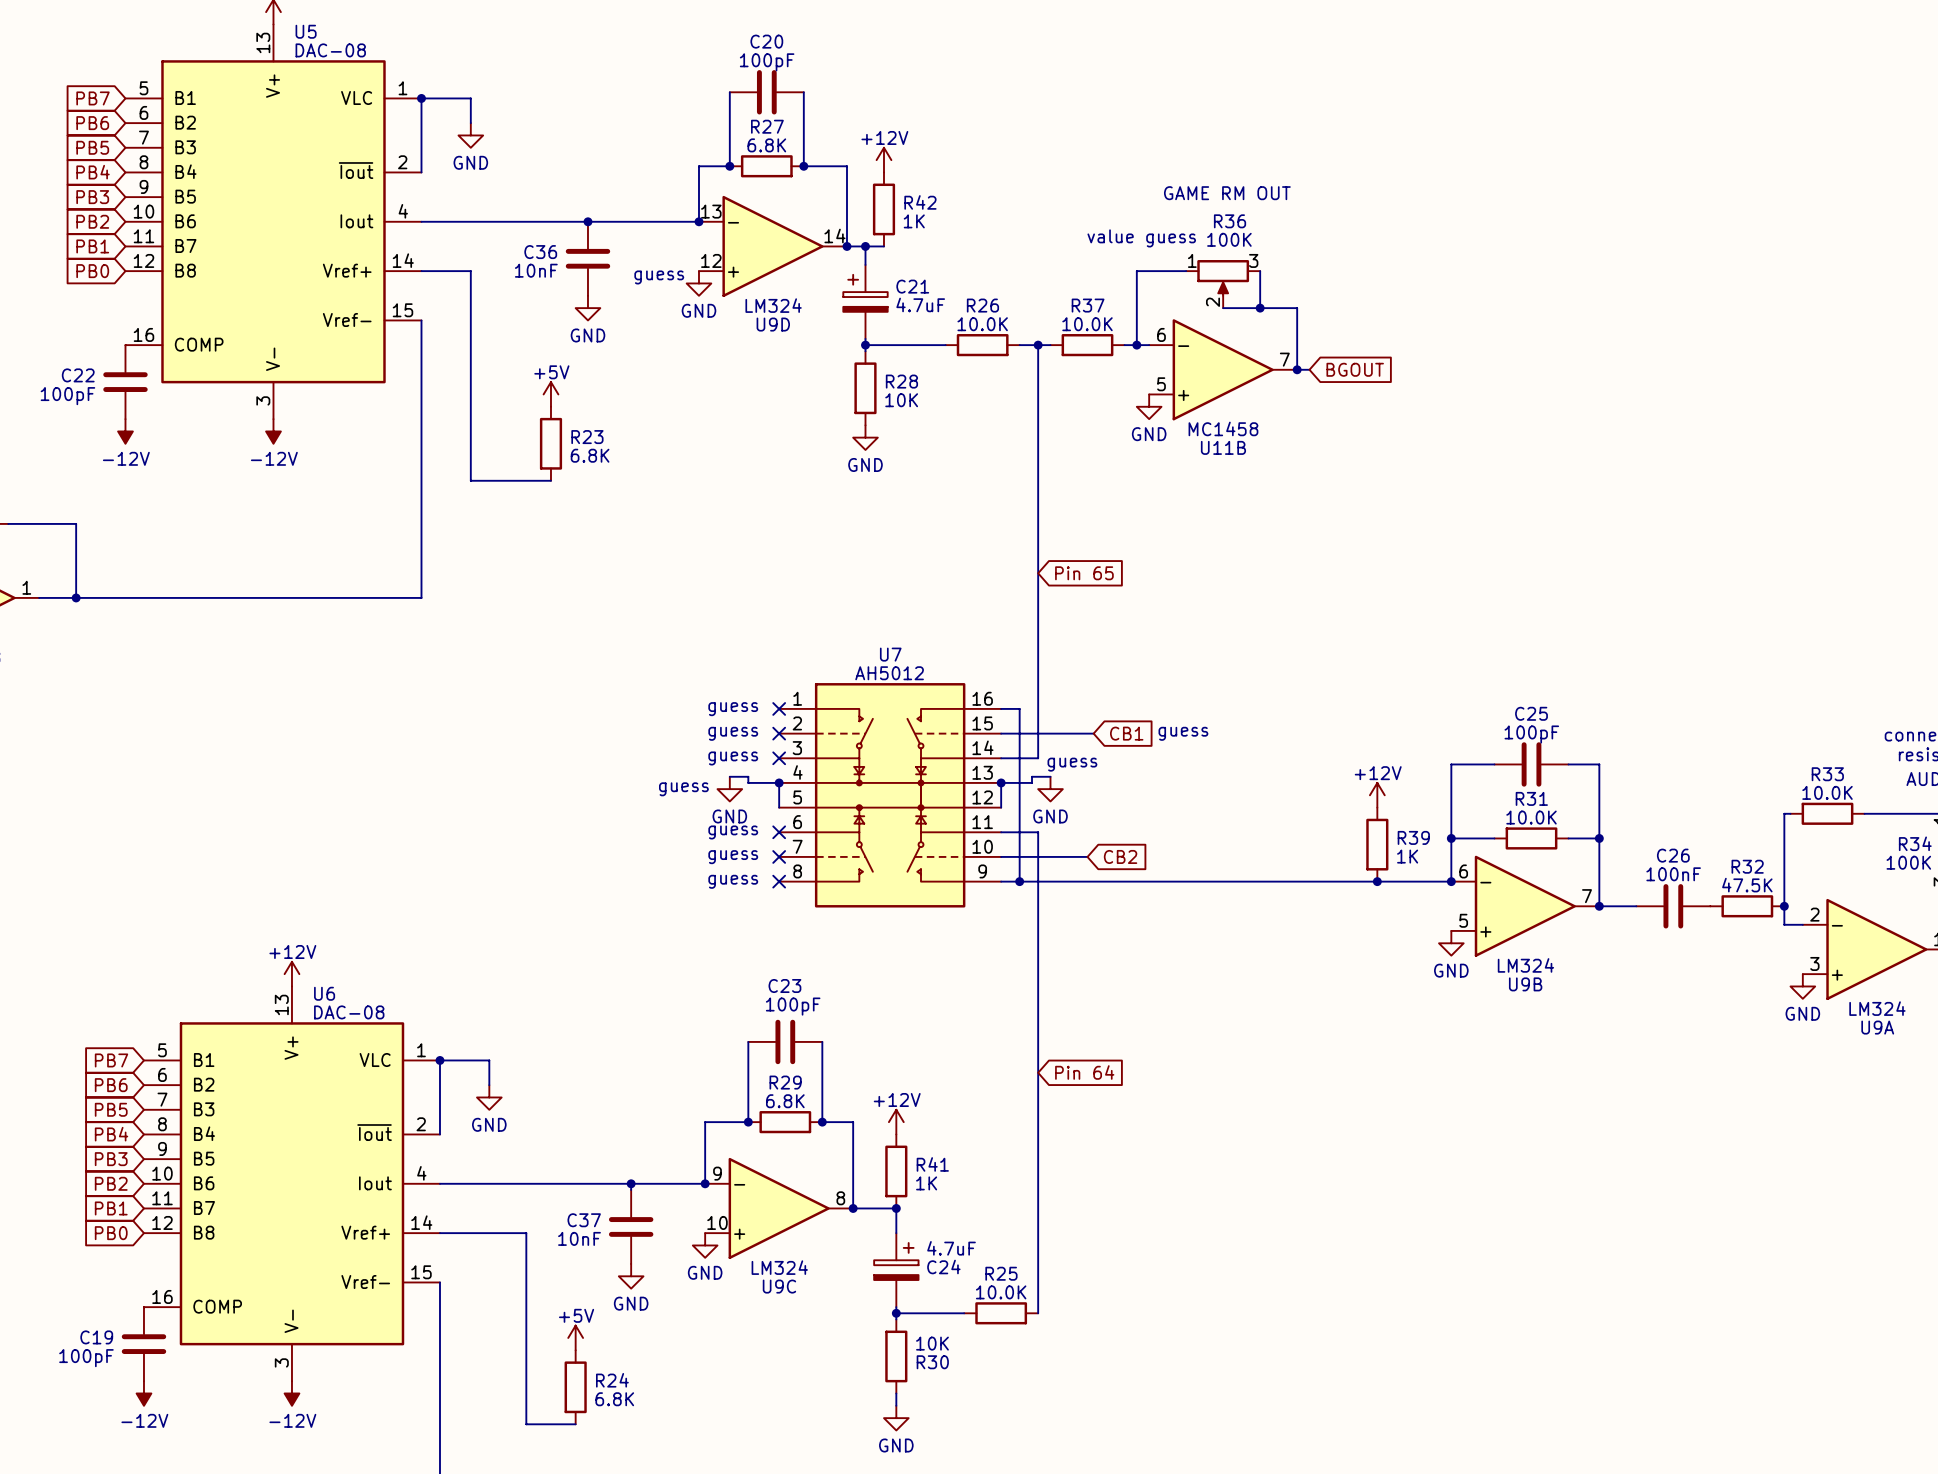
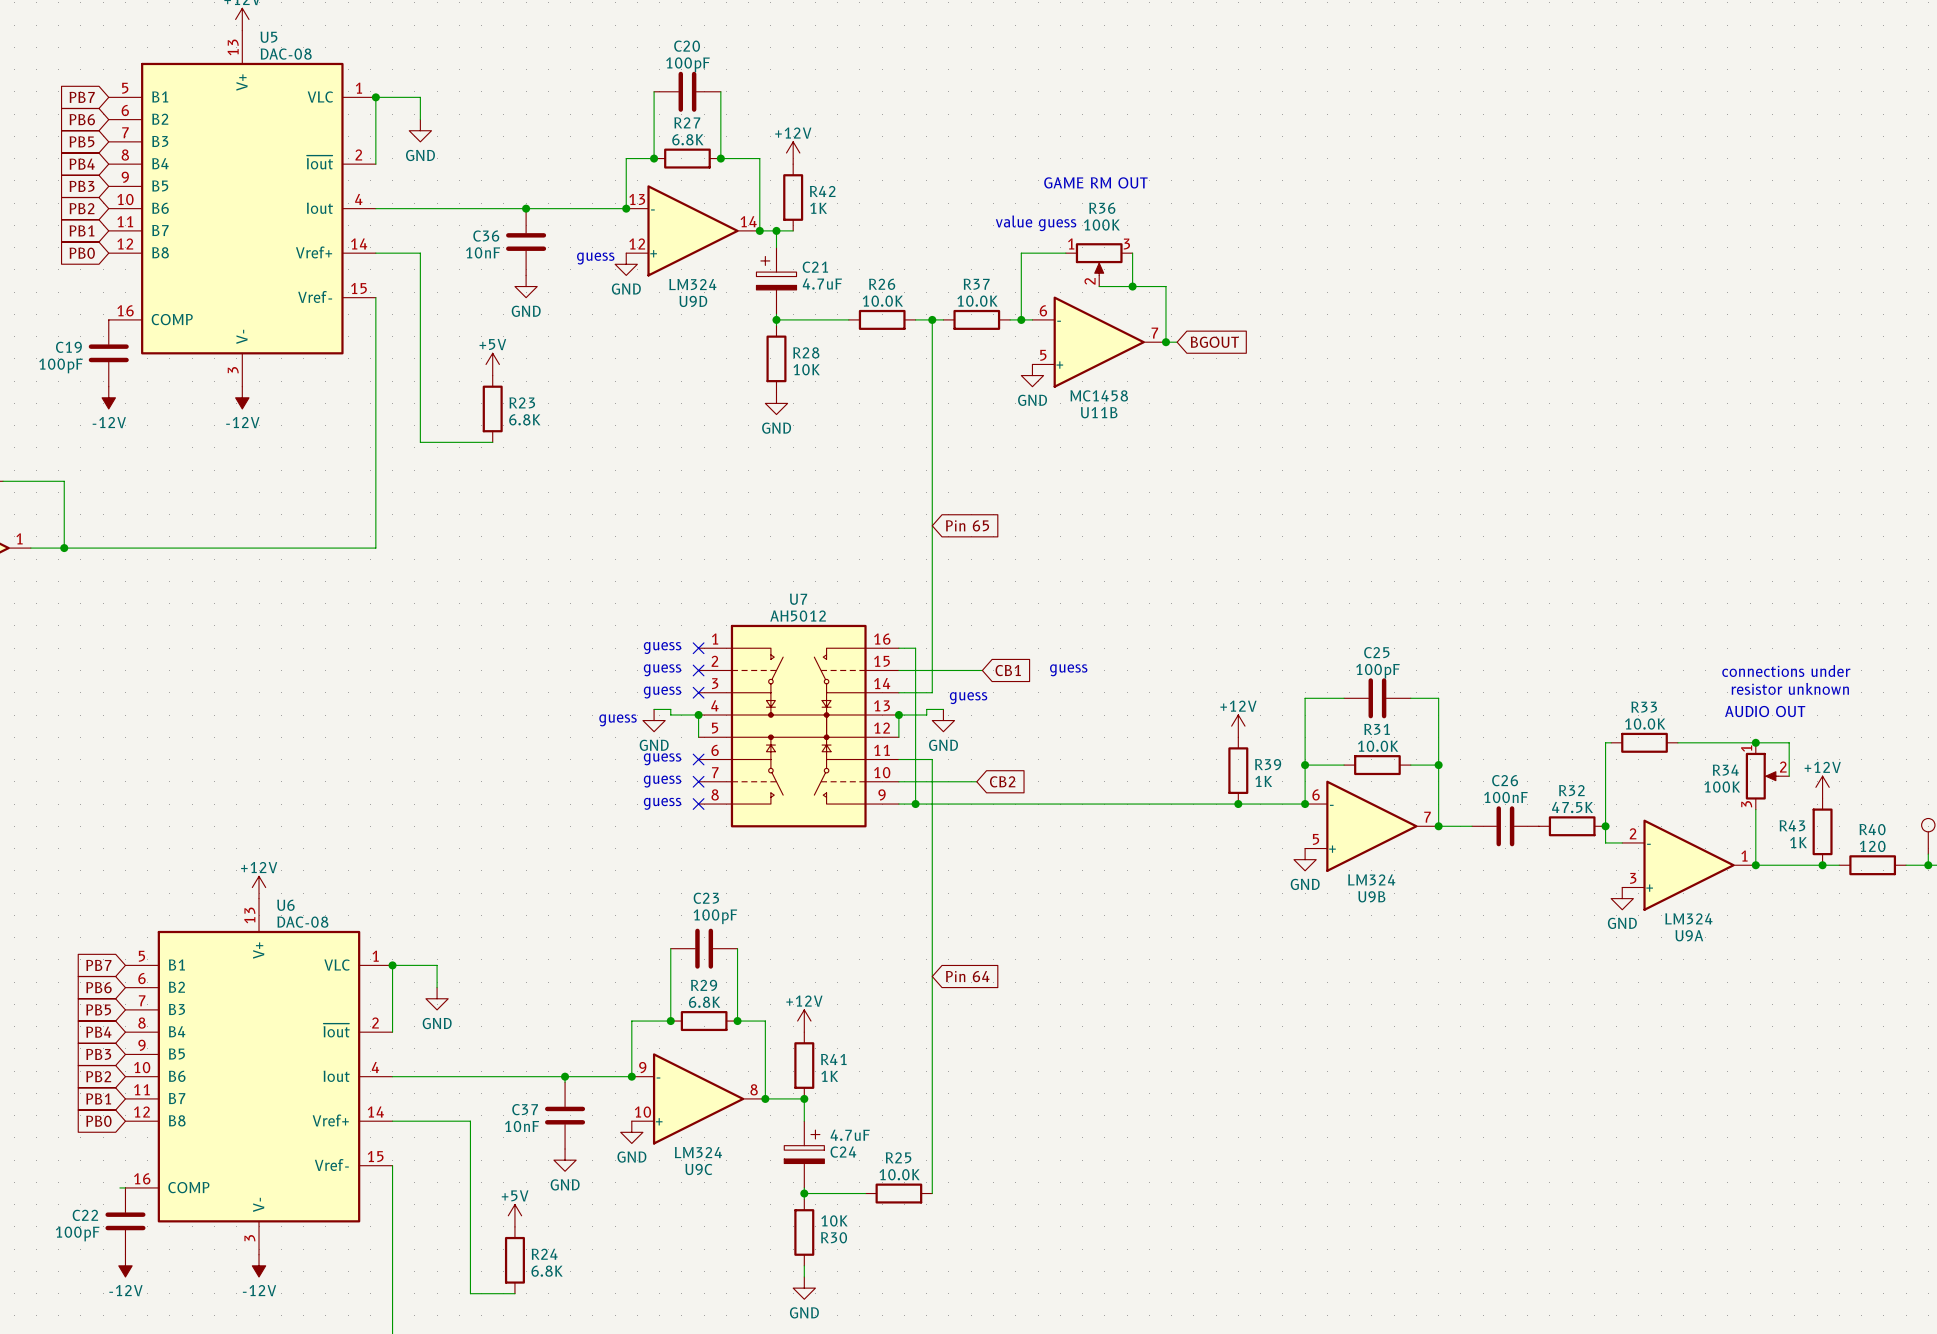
C22 name: C22 (78, 375) -> C19 (68, 347)
wire: none -> (119, 1187) (125, 1187)
C19 name: C19 (96, 1337) -> C22 (85, 1215)

